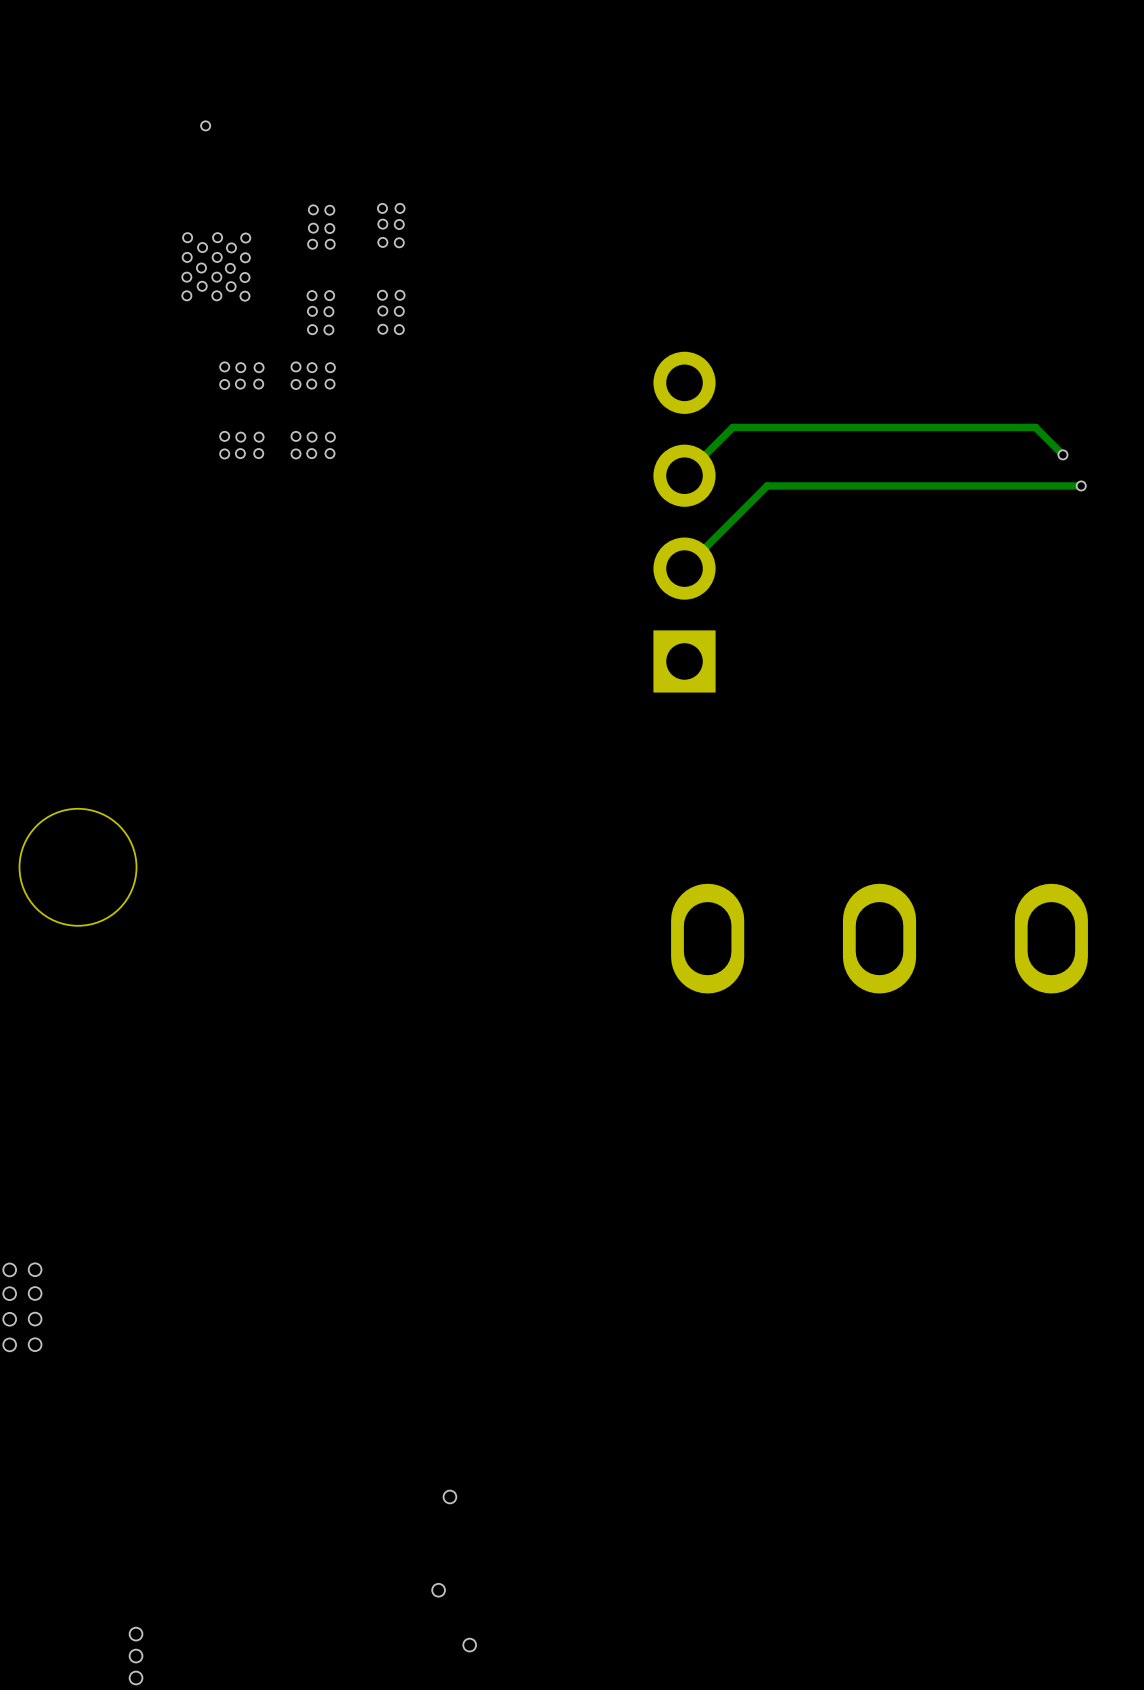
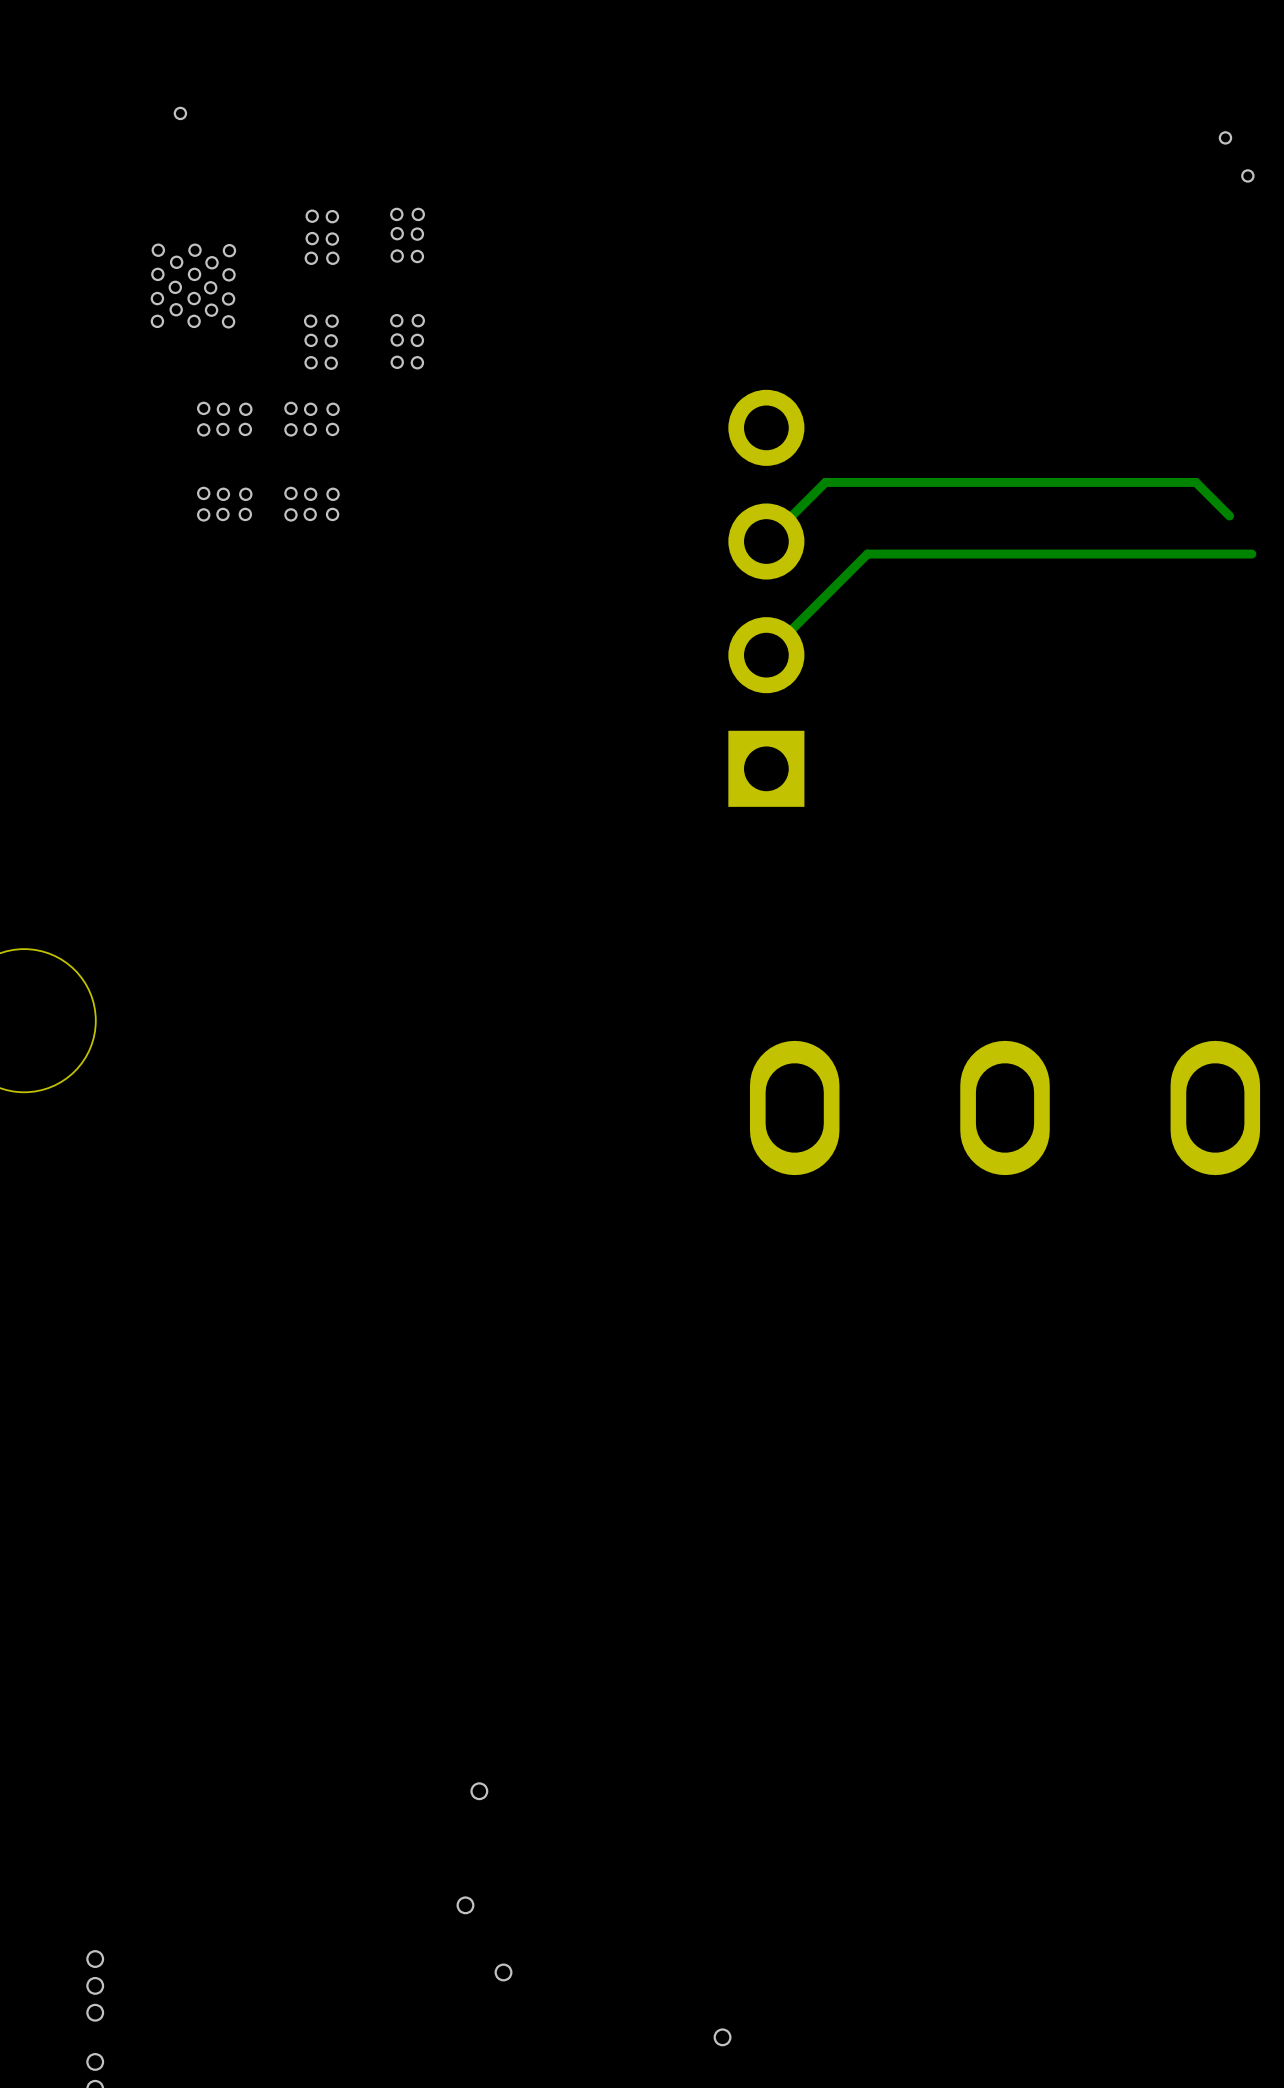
via: none -> (1225, 137)
via: none -> (1247, 175)
via: (1062, 454) -> none
via: (1081, 485) -> none

